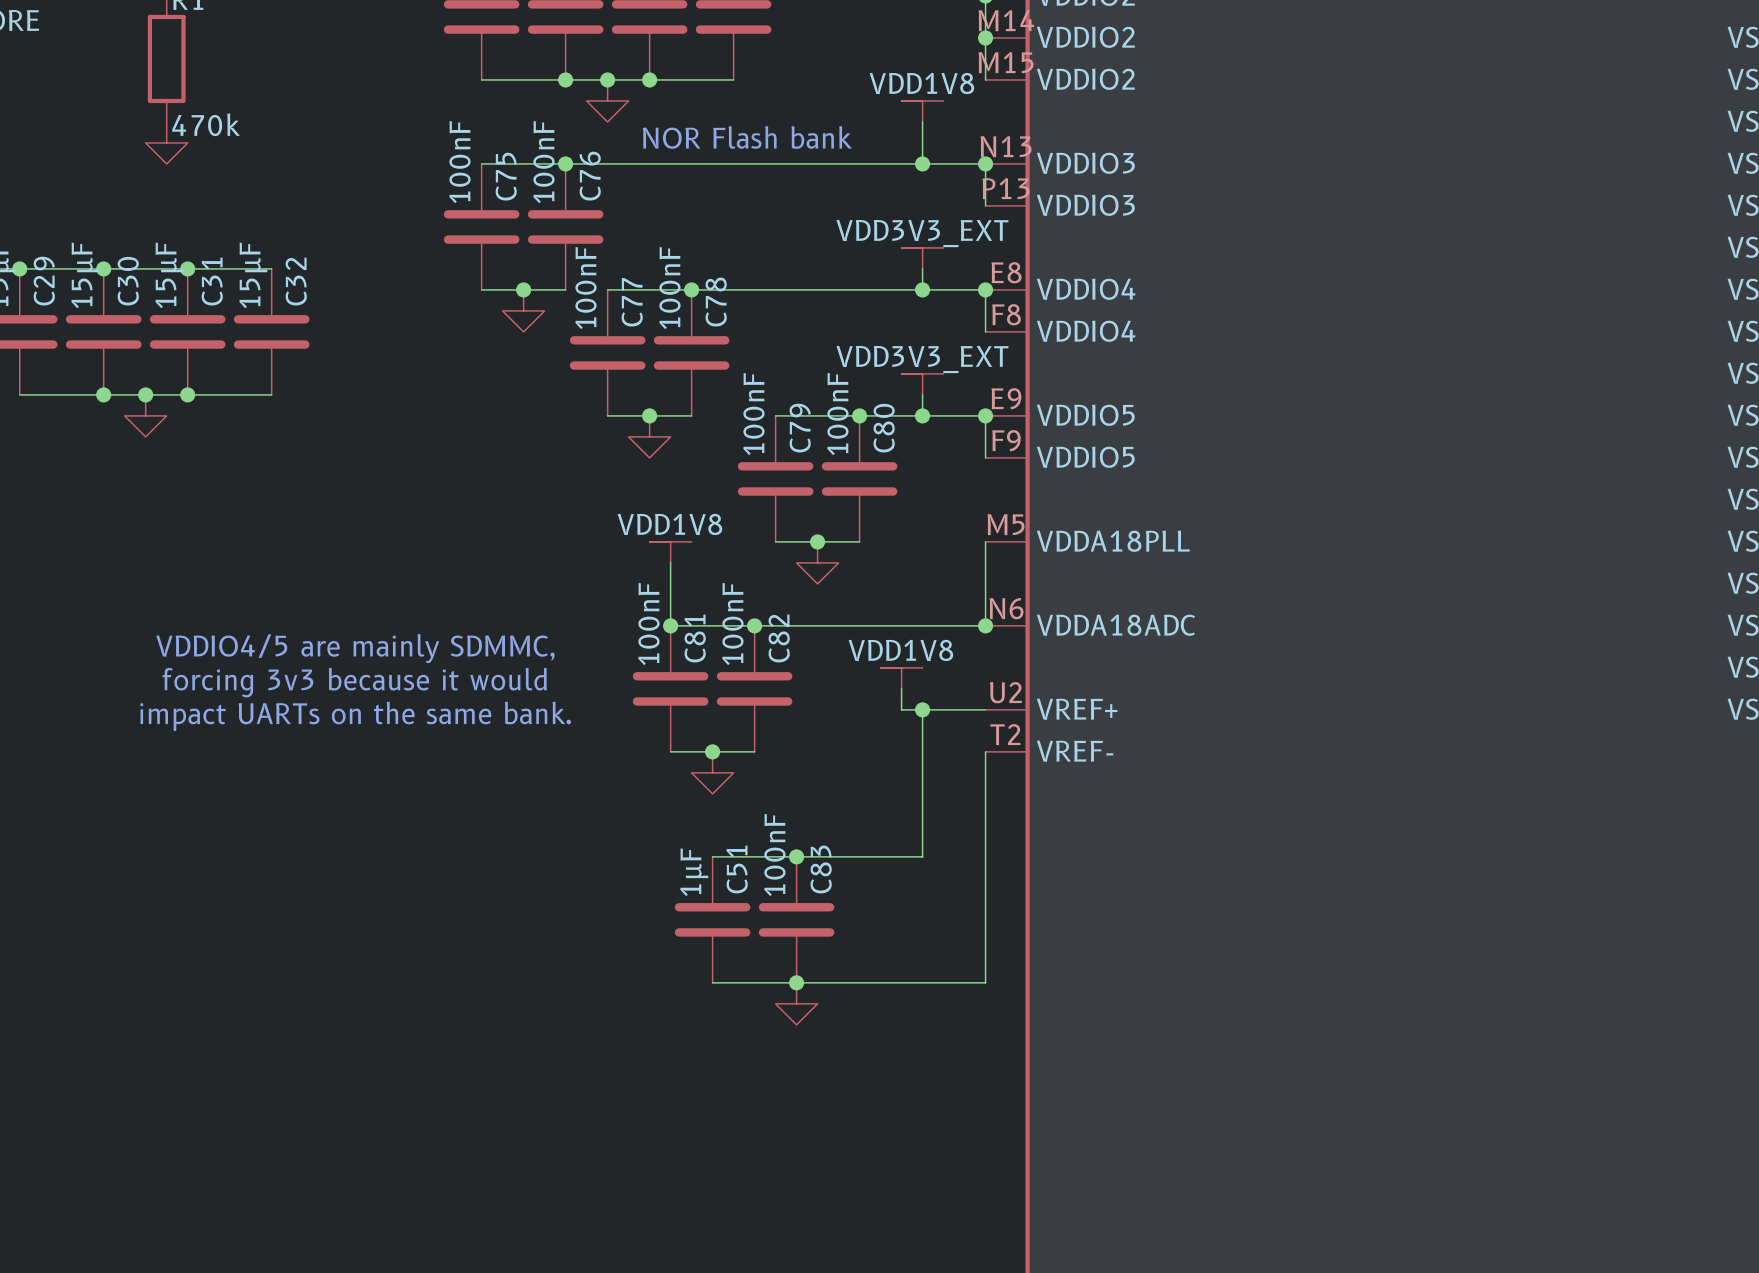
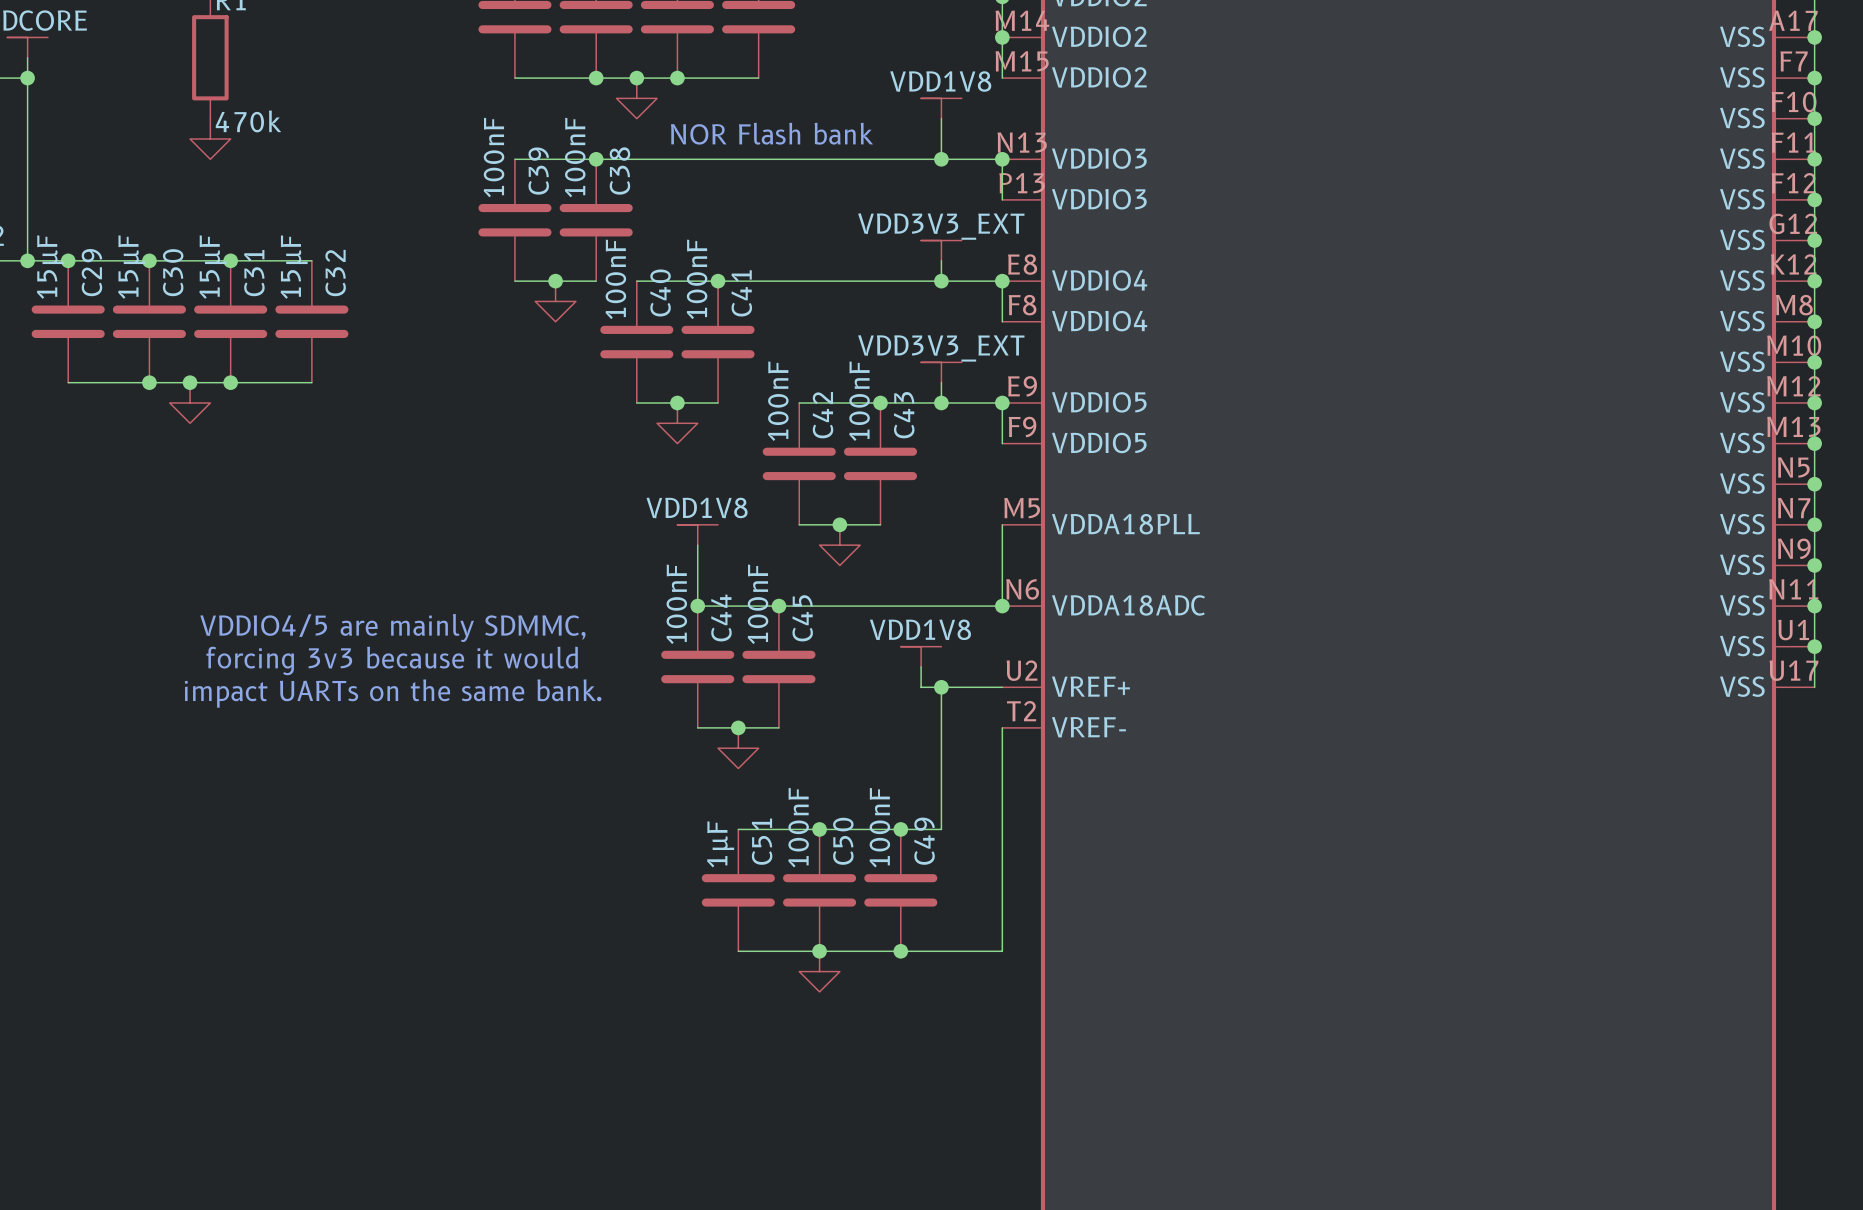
C75 name: C75 (506, 176) -> C39 (538, 171)
C76 name: C76 (590, 176) -> C38 (619, 171)
C77 name: C77 (632, 302) -> C40 (660, 292)
C78 name: C78 (716, 302) -> C41 (741, 293)
C79 name: C79 (800, 428) -> C42 (822, 415)
C80 name: C80 (884, 428) -> C43 (904, 415)
C81 name: C81 (695, 638) -> C44 (721, 617)
C82 name: C82 (779, 638) -> C45 (802, 618)
junction: none -> (900, 829)
C83 name: C83 (821, 869) -> C50 (843, 841)
C49: none -> 100nF (900, 890)
junction: none -> (900, 951)

